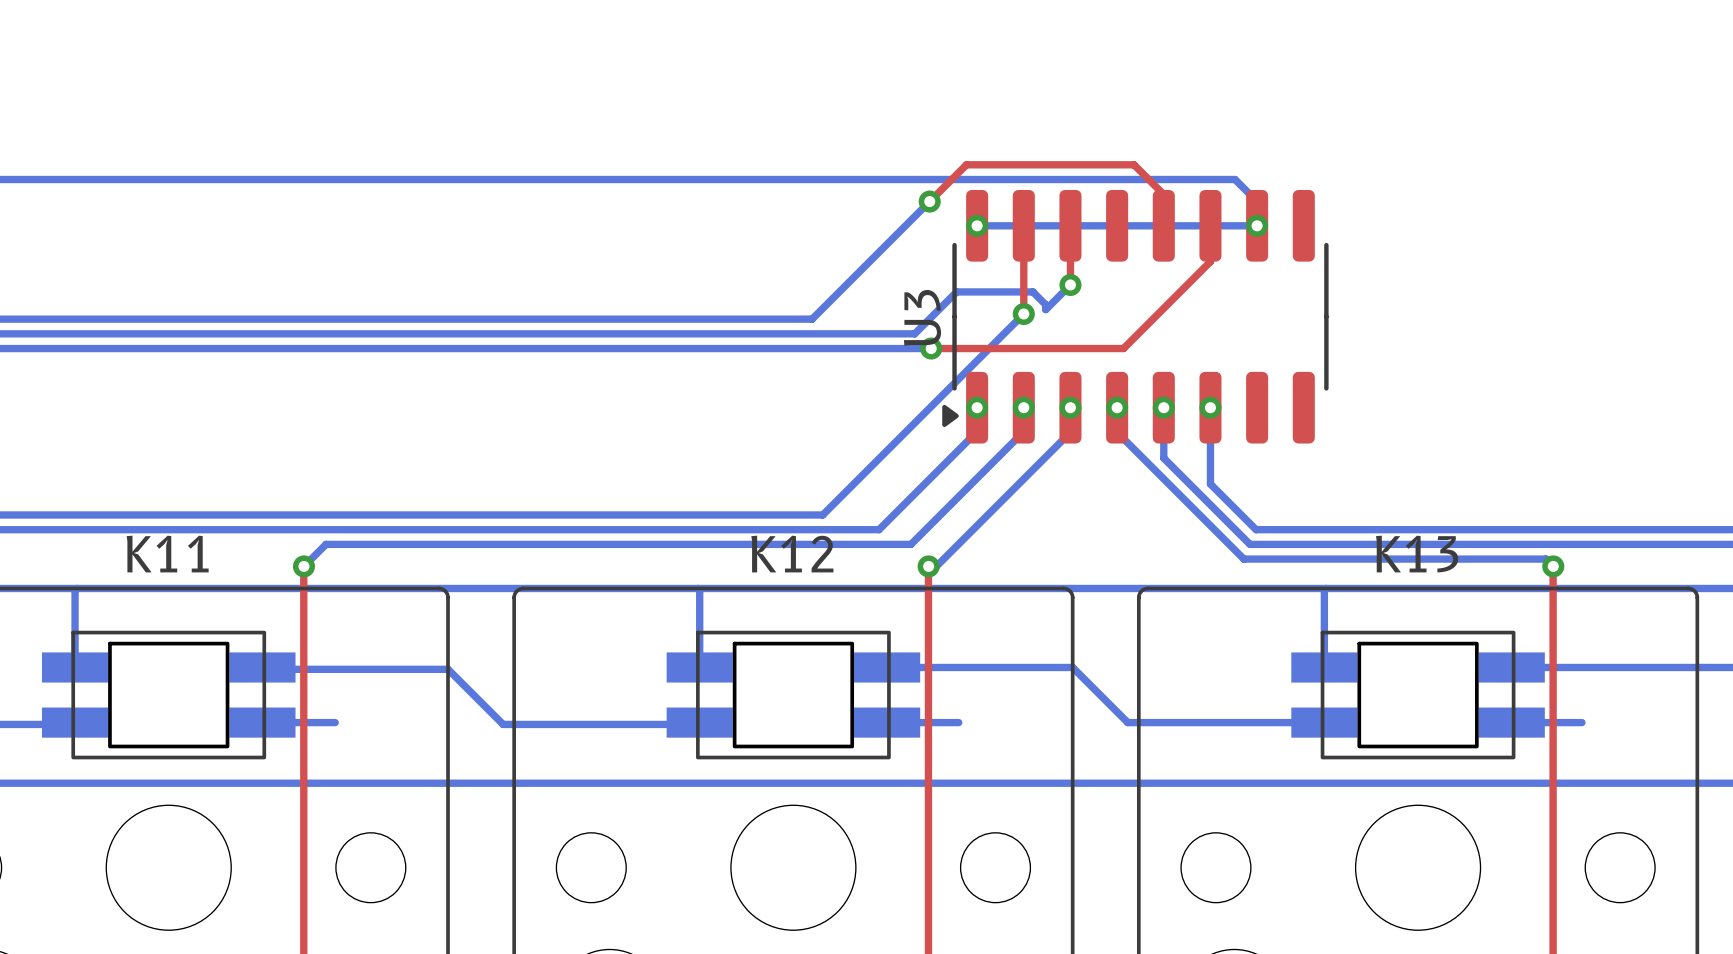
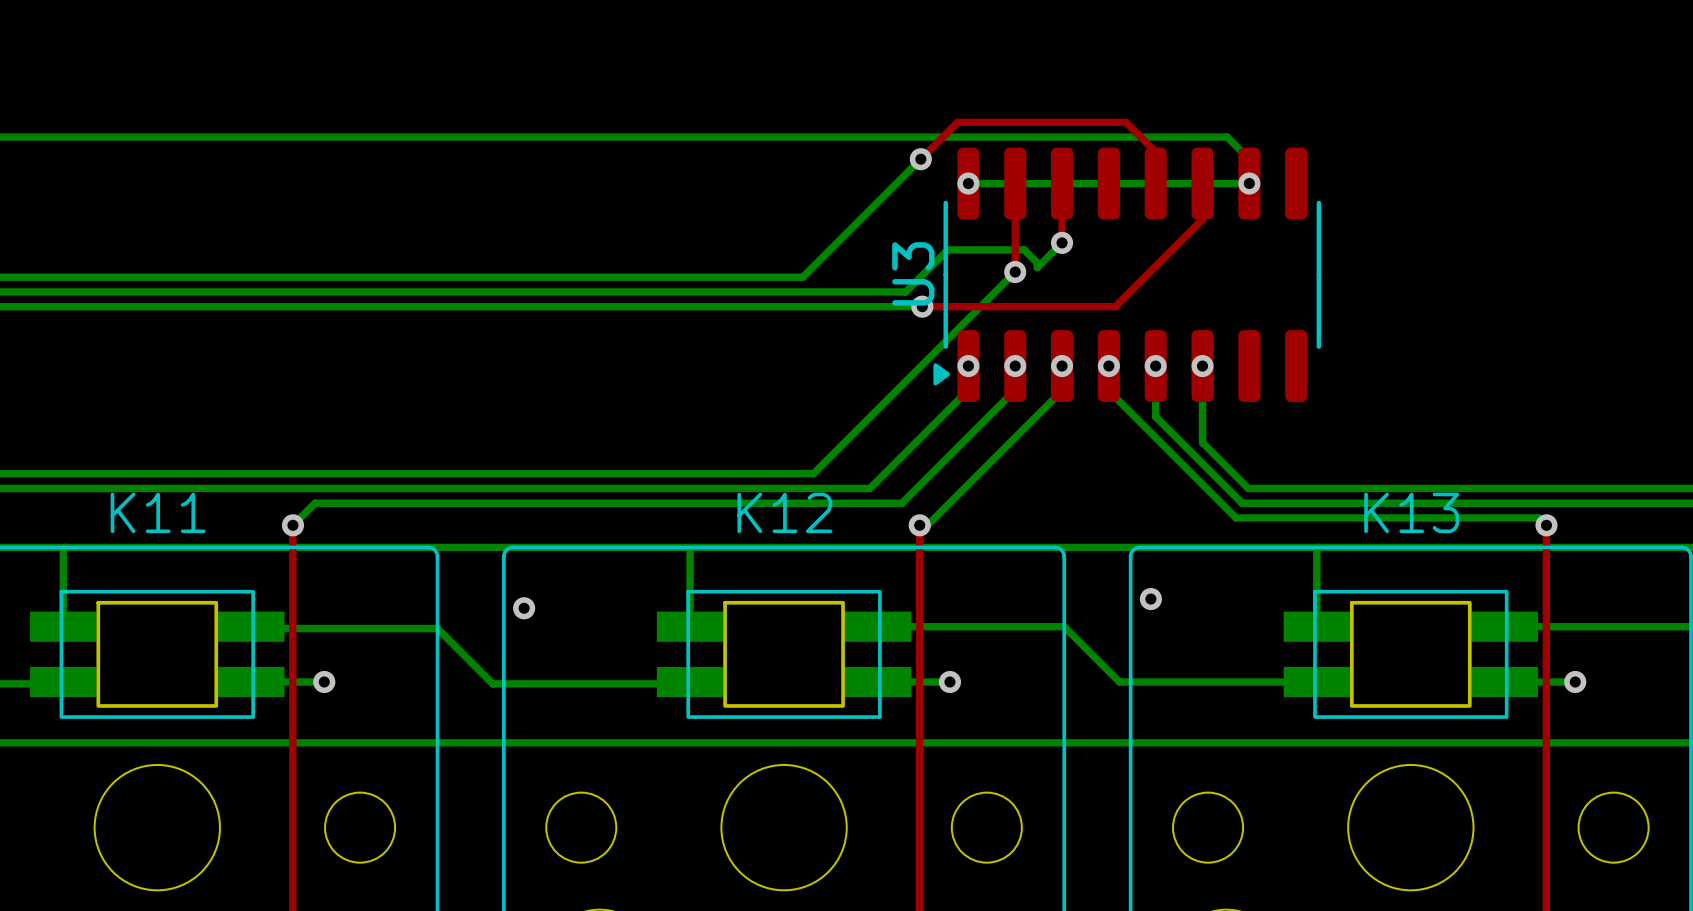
via: none -> (1150, 599)
via: none -> (524, 608)
via: none -> (324, 682)
via: none -> (949, 682)
via: none -> (1575, 682)

